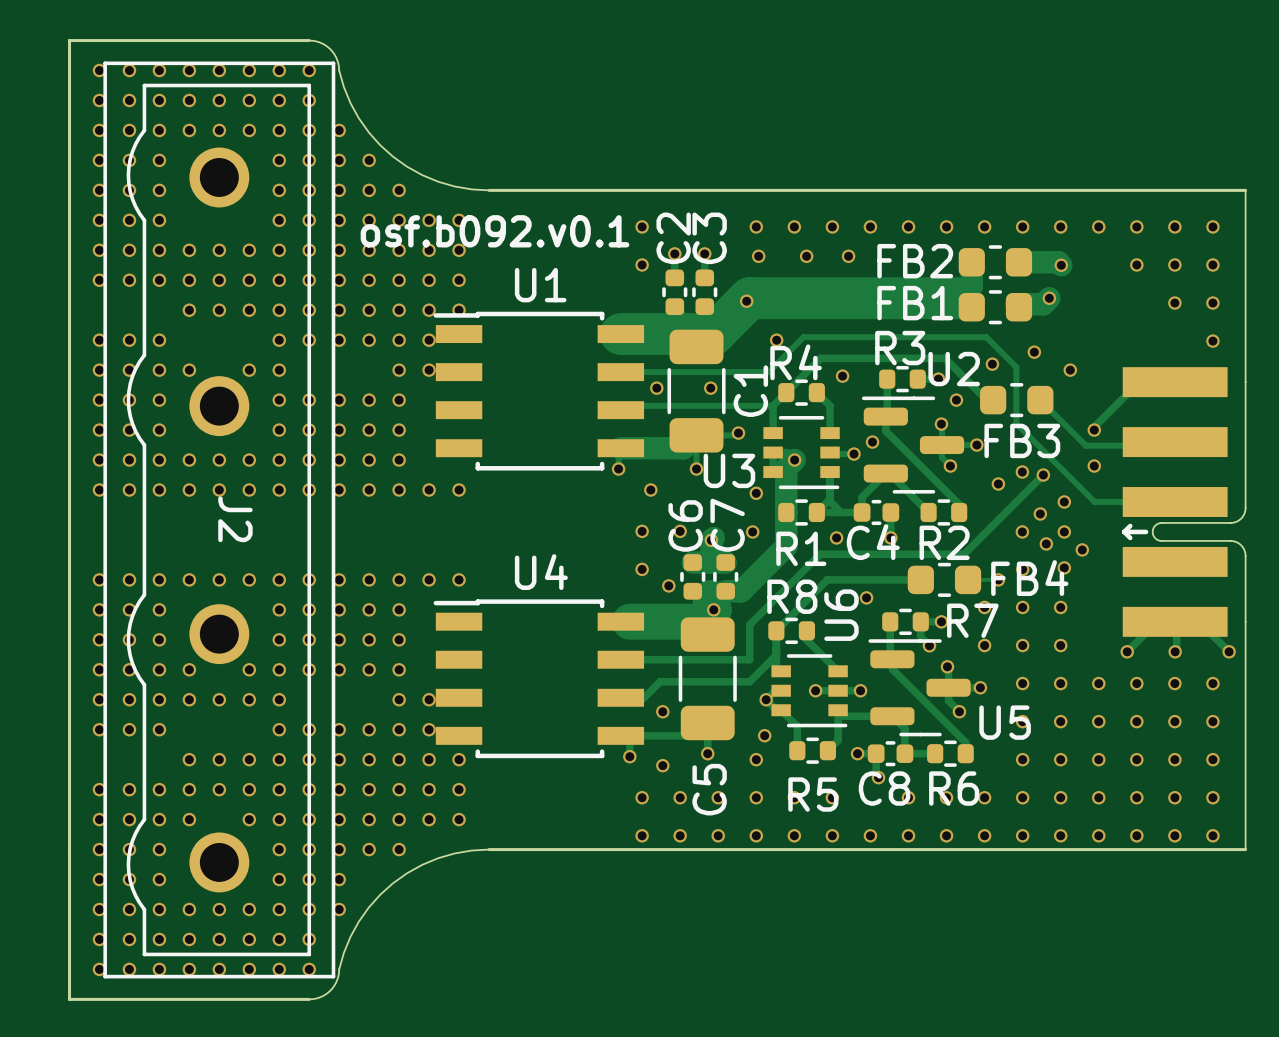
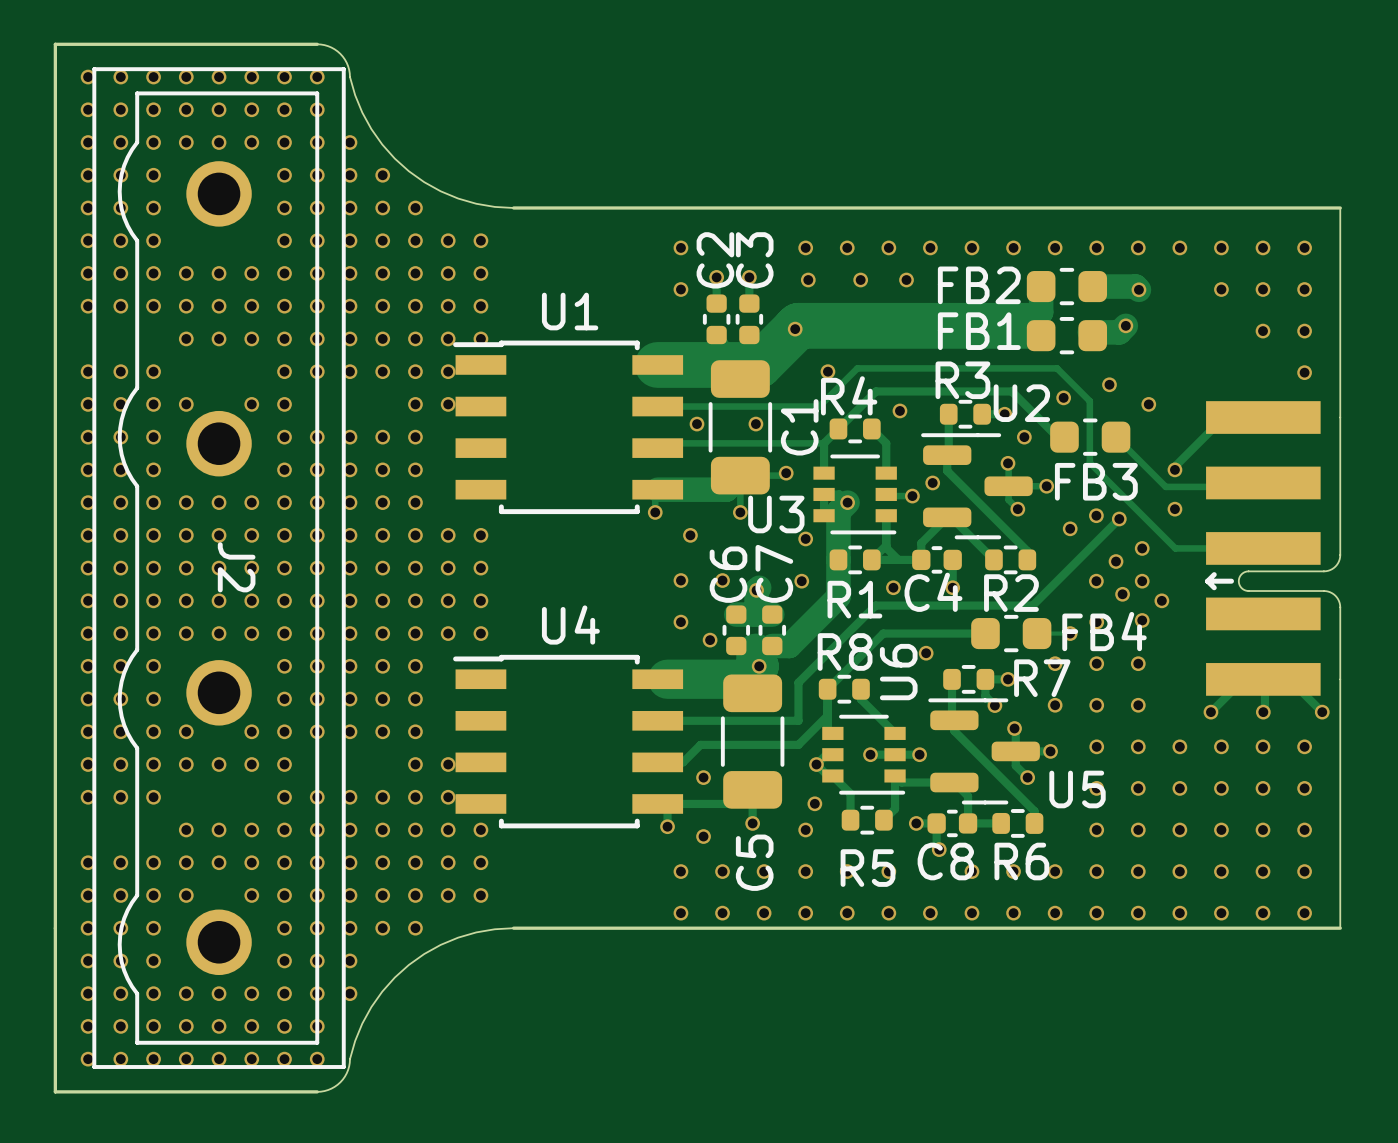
text: osf.b092.v0.1 (495, 231) -> none
via: none -> (88, 568)
via: none -> (120, 568)
via: none -> (153, 568)
via: none -> (186, 568)
via: none -> (219, 568)
via: none -> (251, 568)
via: none -> (284, 568)
via: none -> (317, 568)
via: none -> (349, 568)
via: none -> (382, 568)
via: none -> (415, 568)
via: none -> (448, 568)
via: none -> (480, 568)
via: none -> (88, 600)
via: none -> (120, 600)
via: none -> (153, 600)
via: none -> (186, 600)
via: none -> (219, 600)
via: none -> (251, 600)
via: none -> (284, 600)
via: none -> (317, 600)
via: none -> (349, 600)
via: none -> (382, 600)
via: none -> (415, 600)
via: none -> (448, 600)
via: none -> (480, 600)

